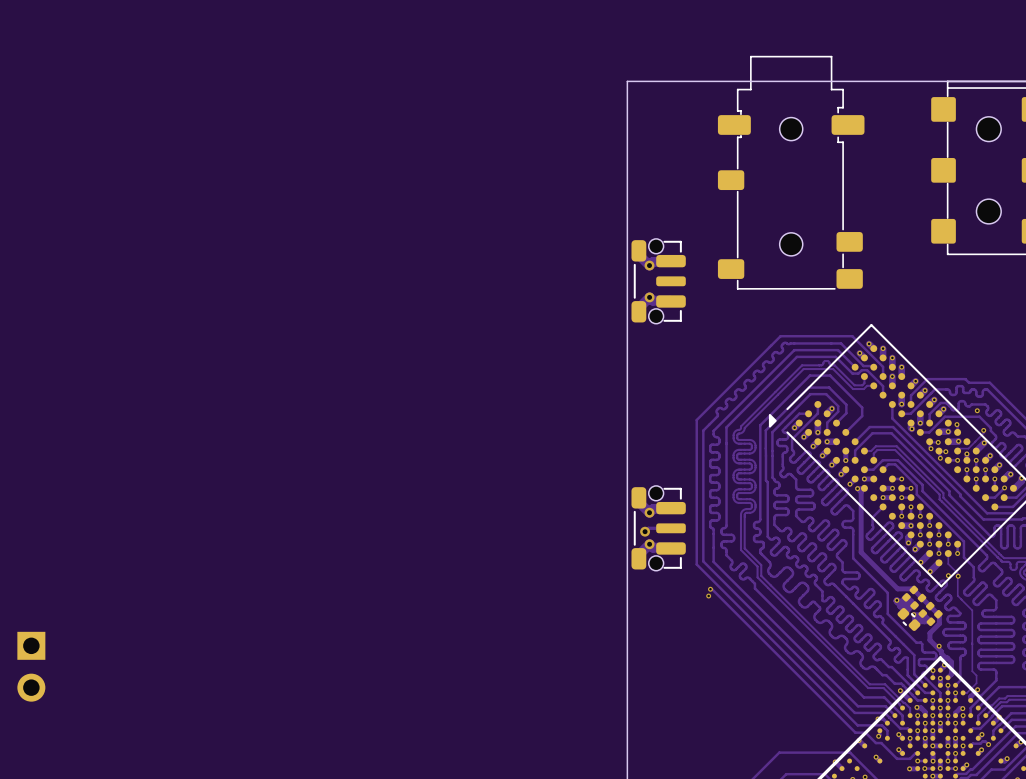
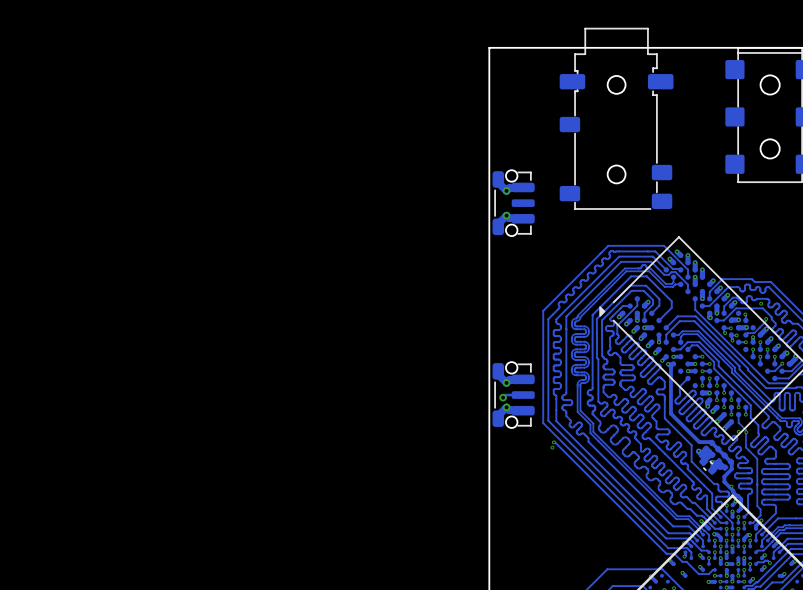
part: (31, 666) -> none

